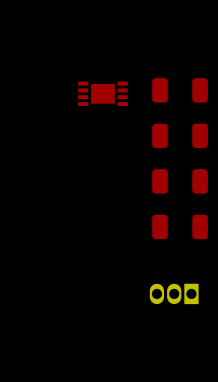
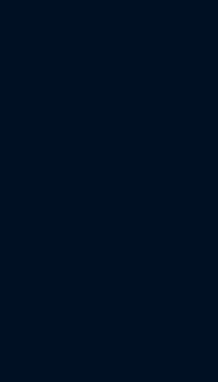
part: (180, 90) -> none
part: (102, 93) -> none
part: (180, 135) -> none
part: (180, 181) -> none
part: (180, 226) -> none
part: (174, 293) -> none

